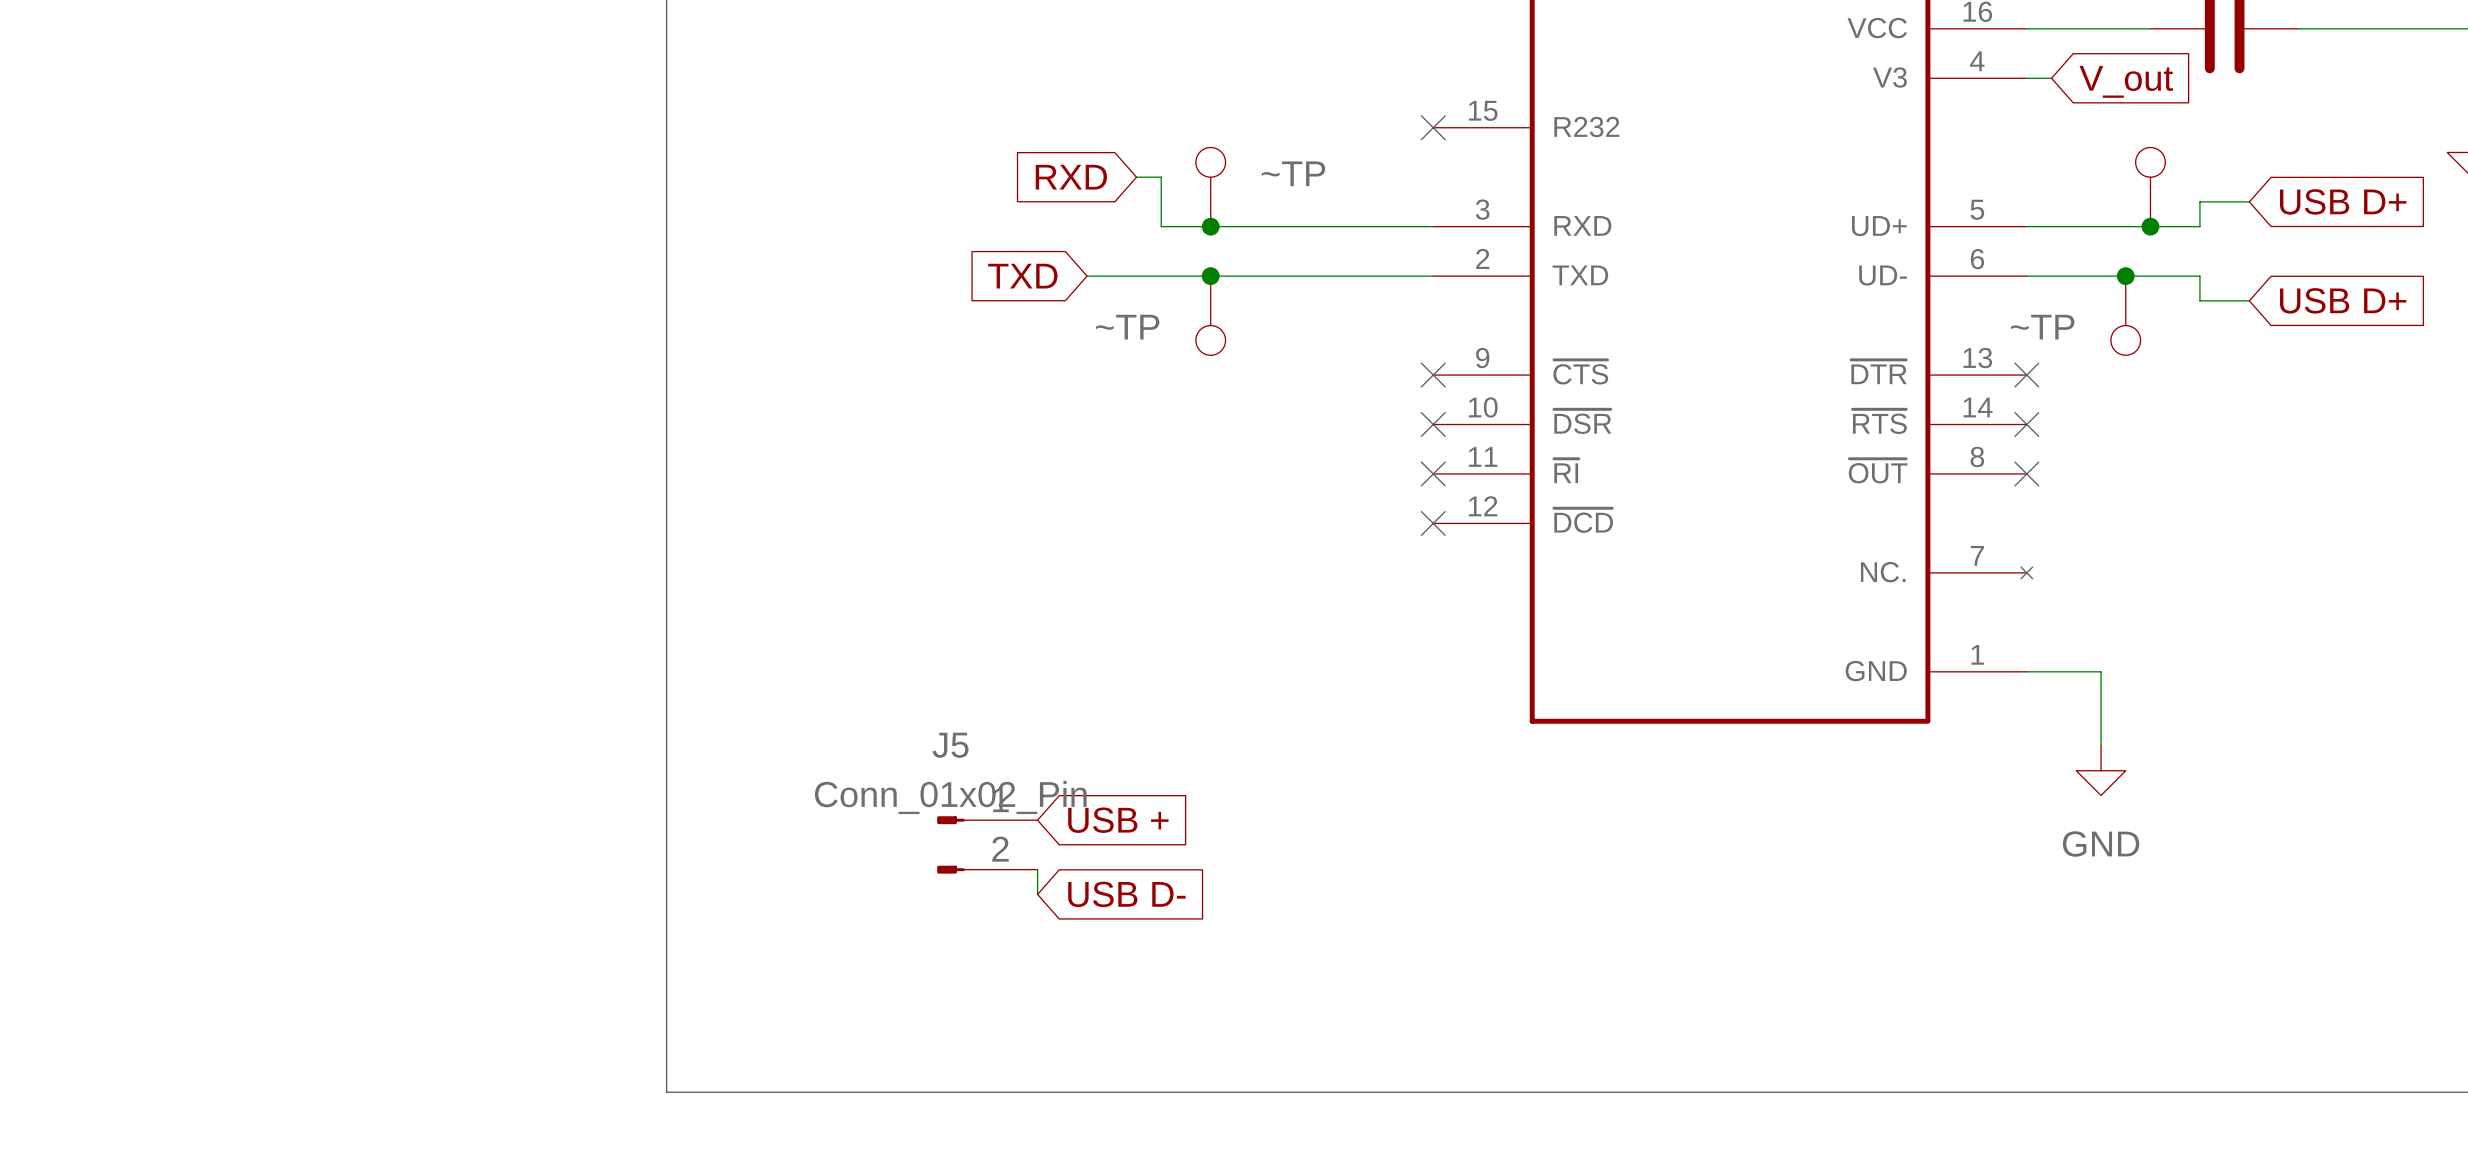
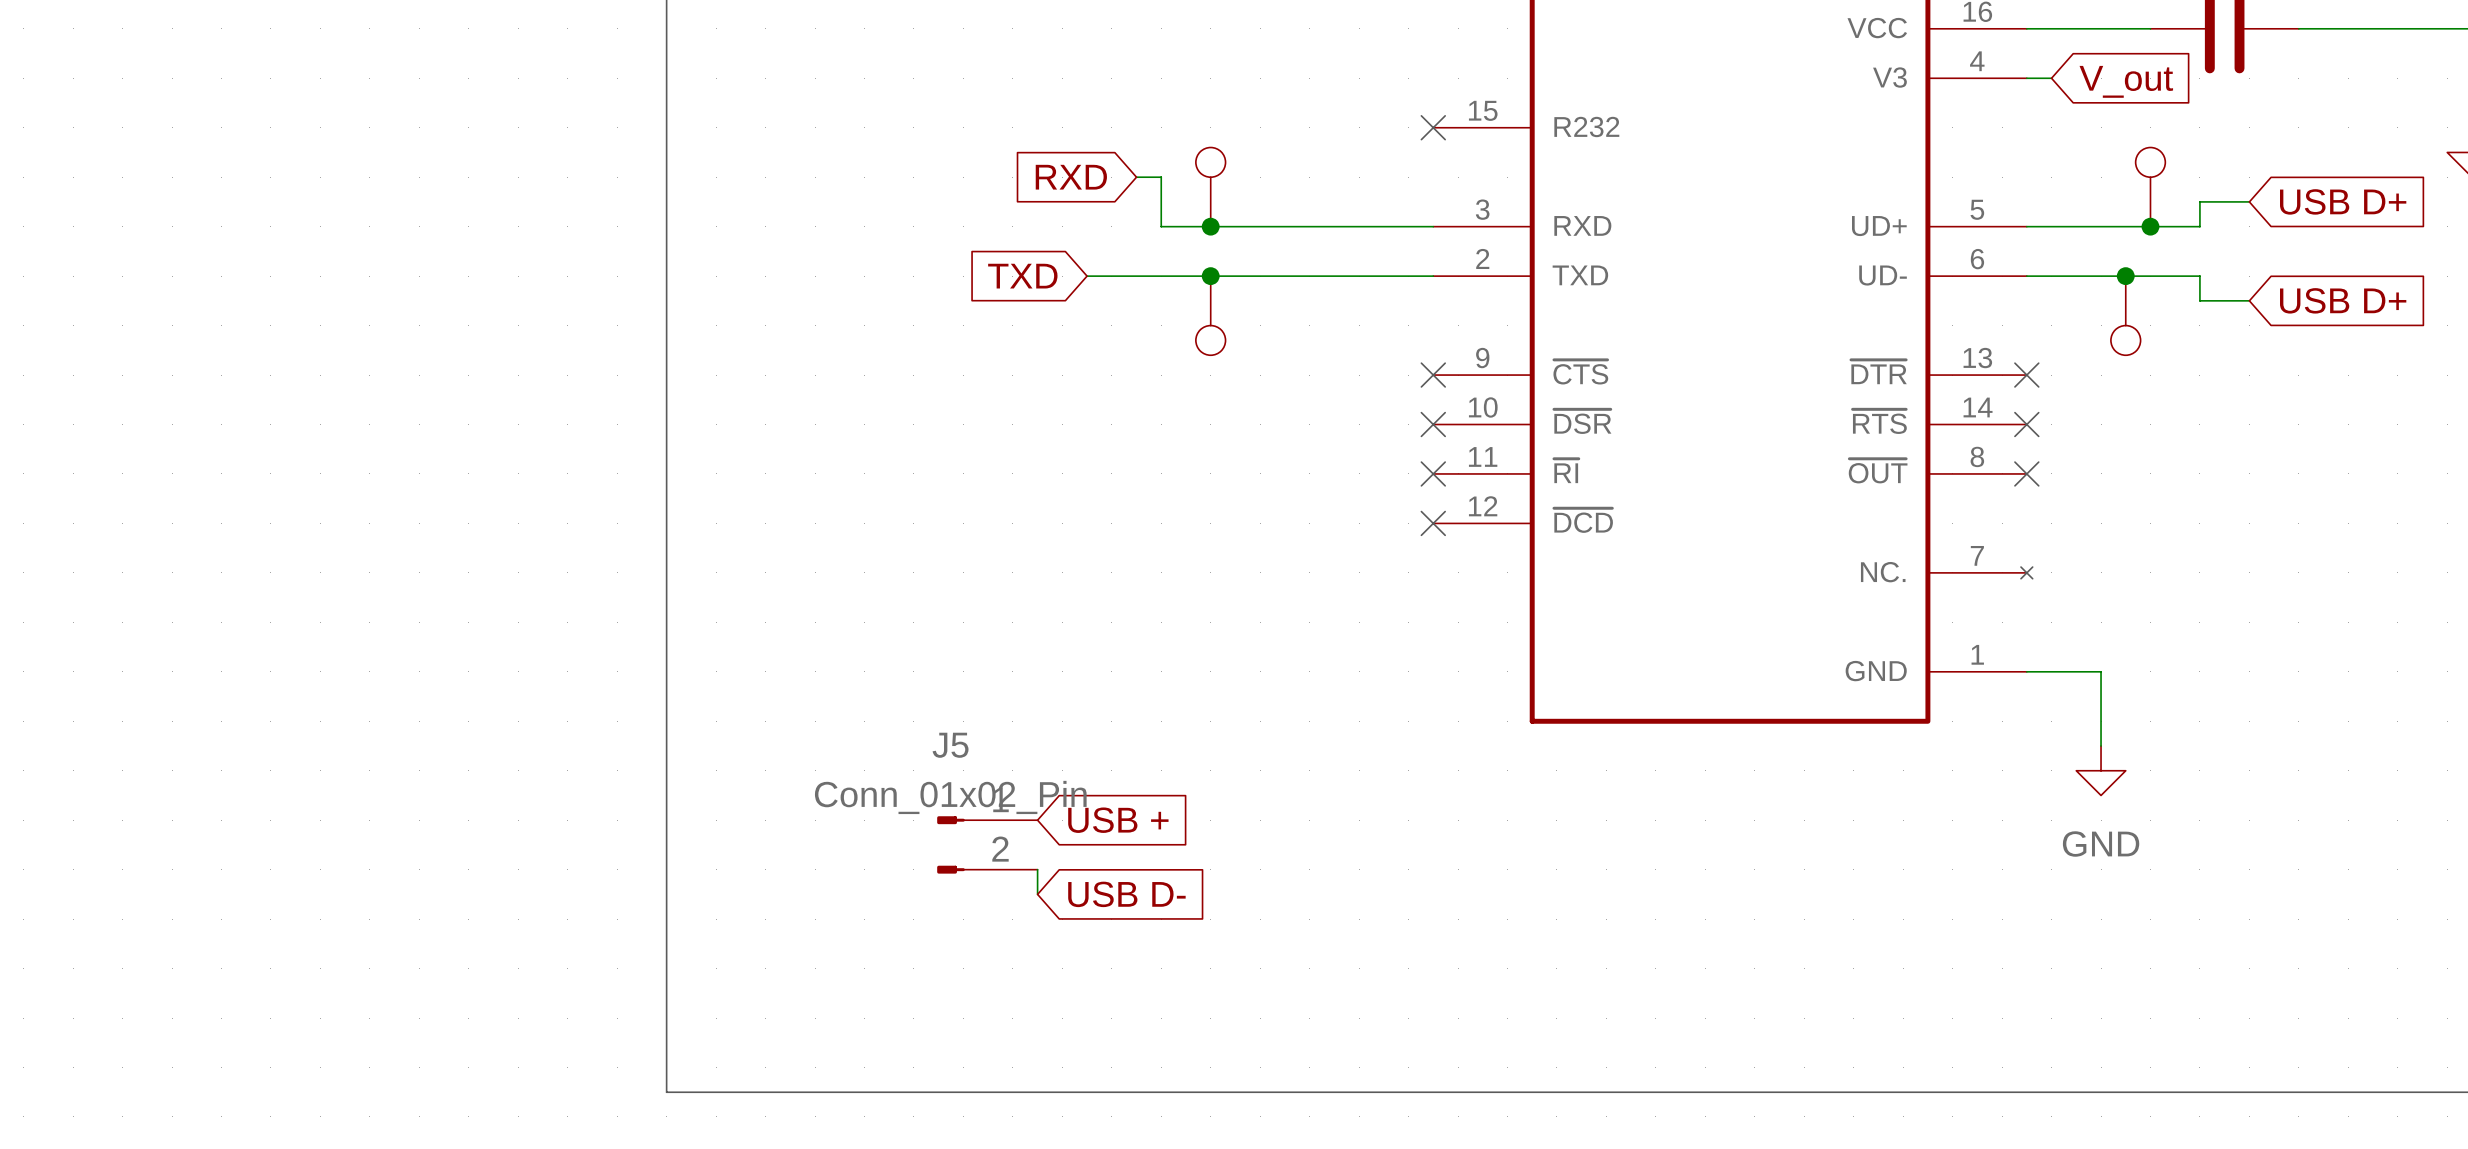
part value: ~TP (1293, 173) -> none
part value: ~TP (1127, 327) -> none
part value: ~TP (2042, 327) -> none

